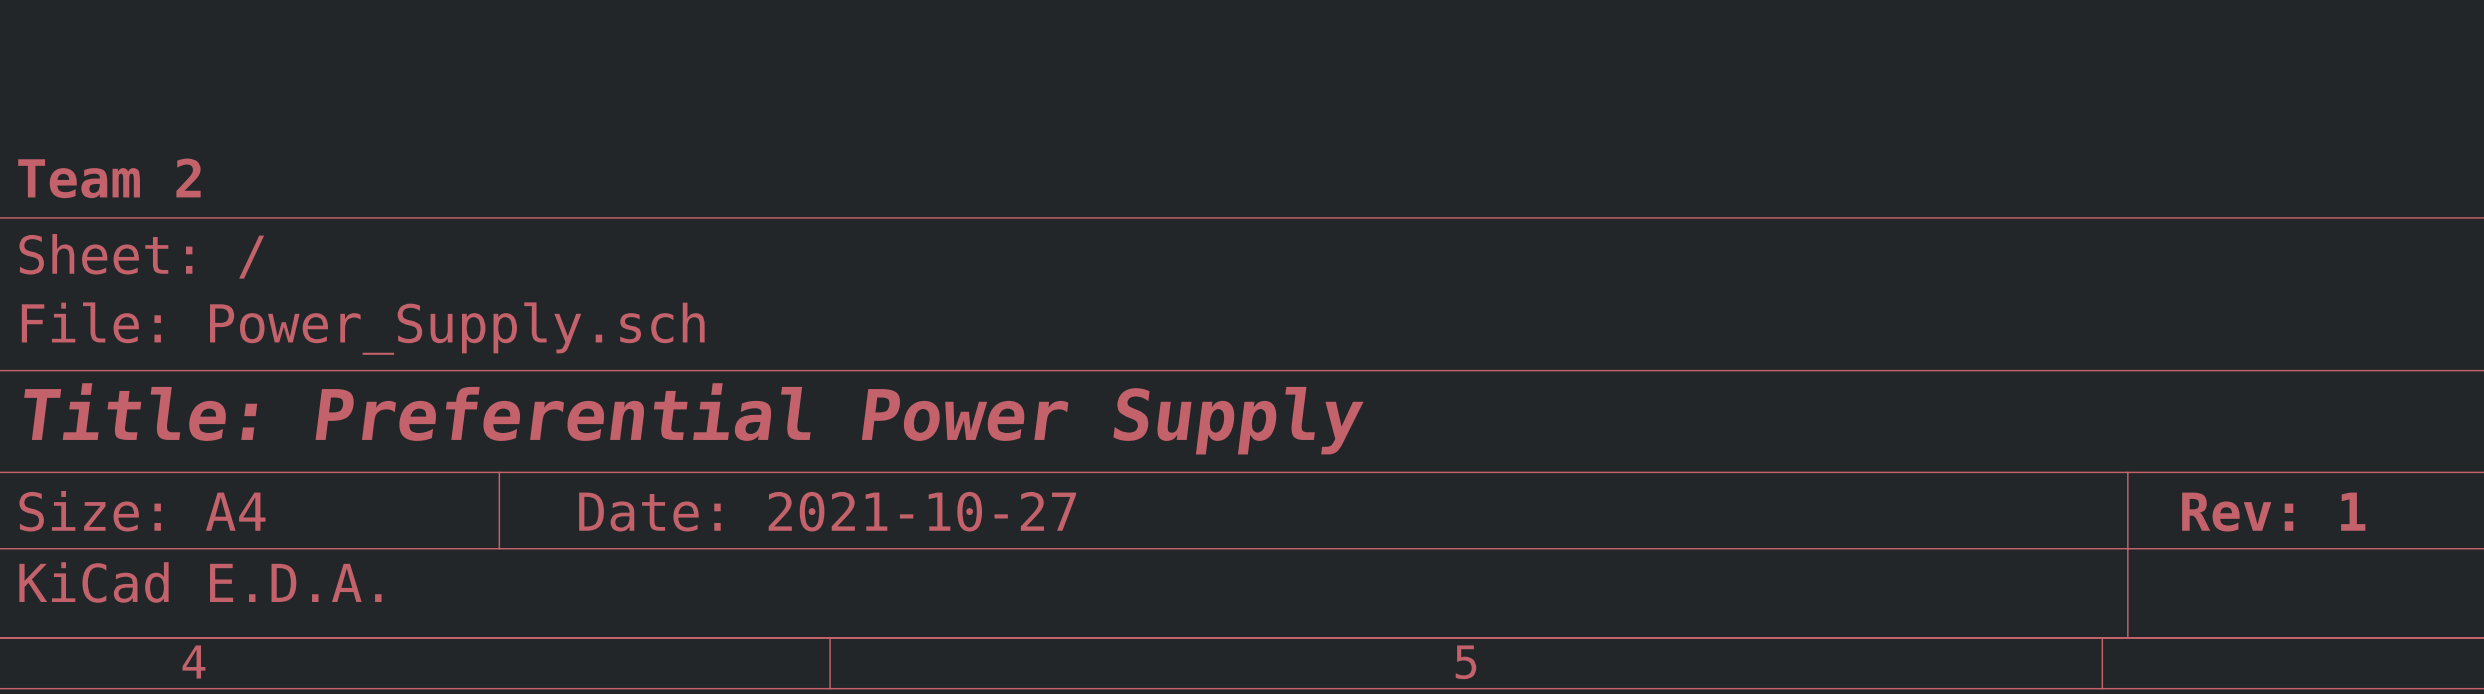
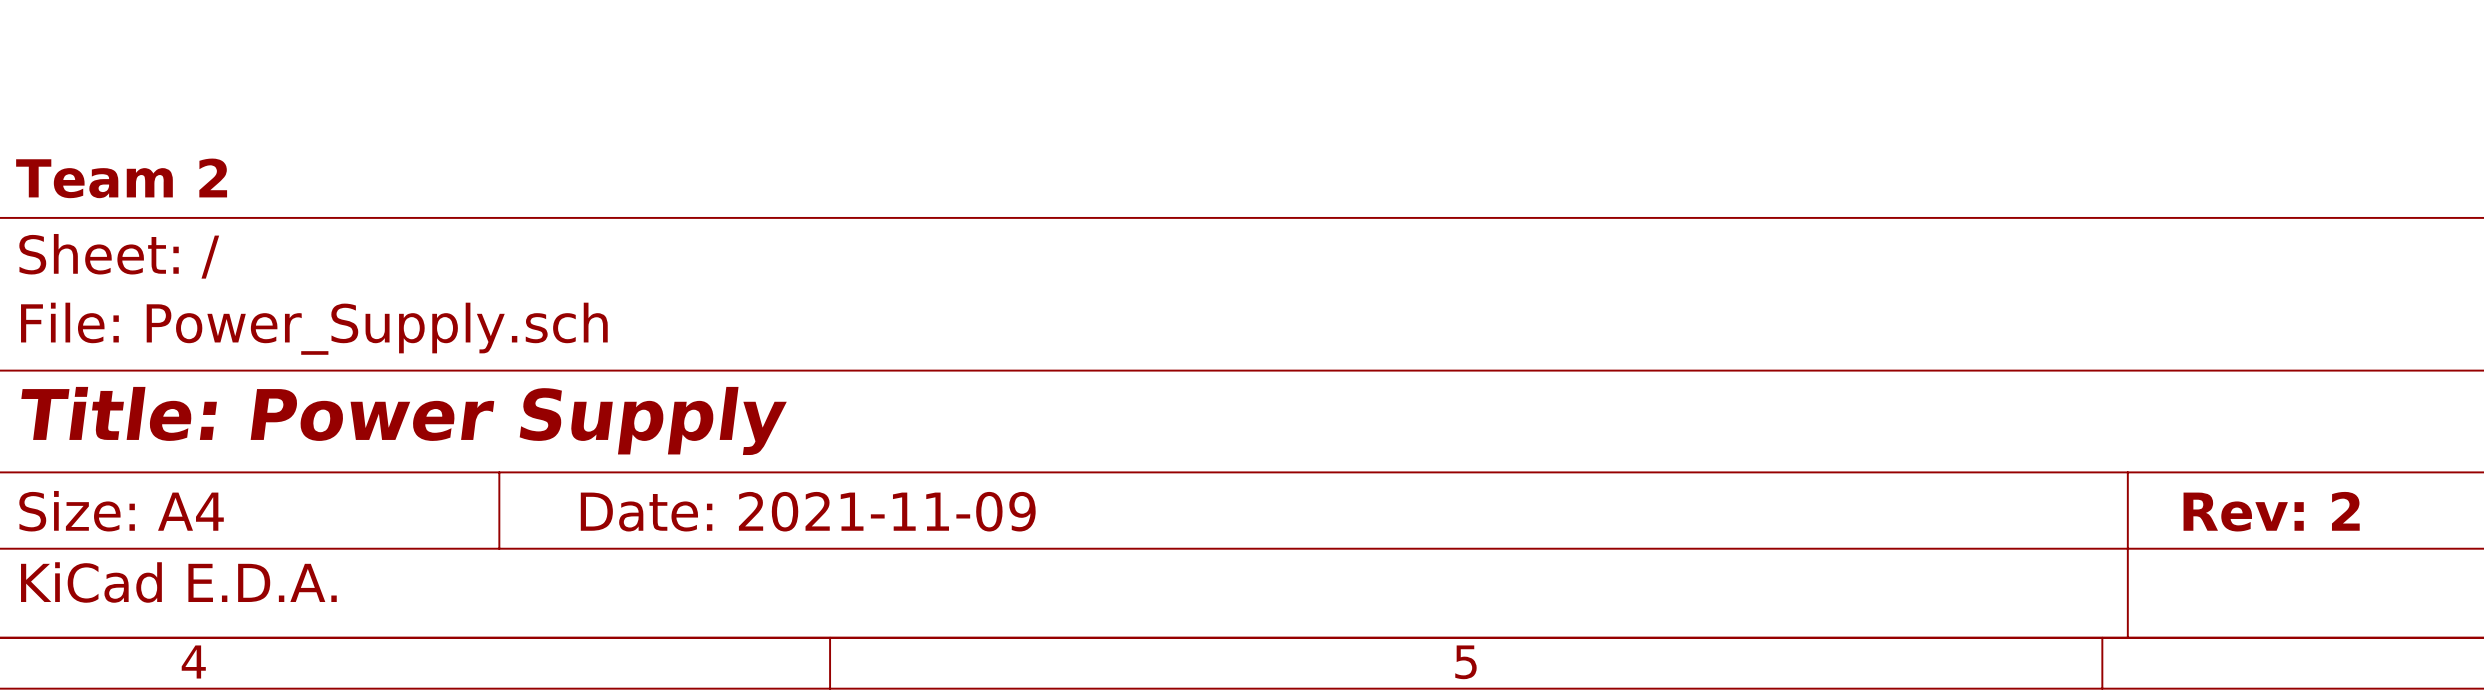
title block: Title: Preferential Power Supply (693, 418) -> Title: Power Supply (404, 420)
title block: Date: 2021-10-27 (827, 511) -> Date: 2021-11-09 (808, 511)
title block: Rev: 1 (2273, 512) -> Rev: 2 (2271, 511)

